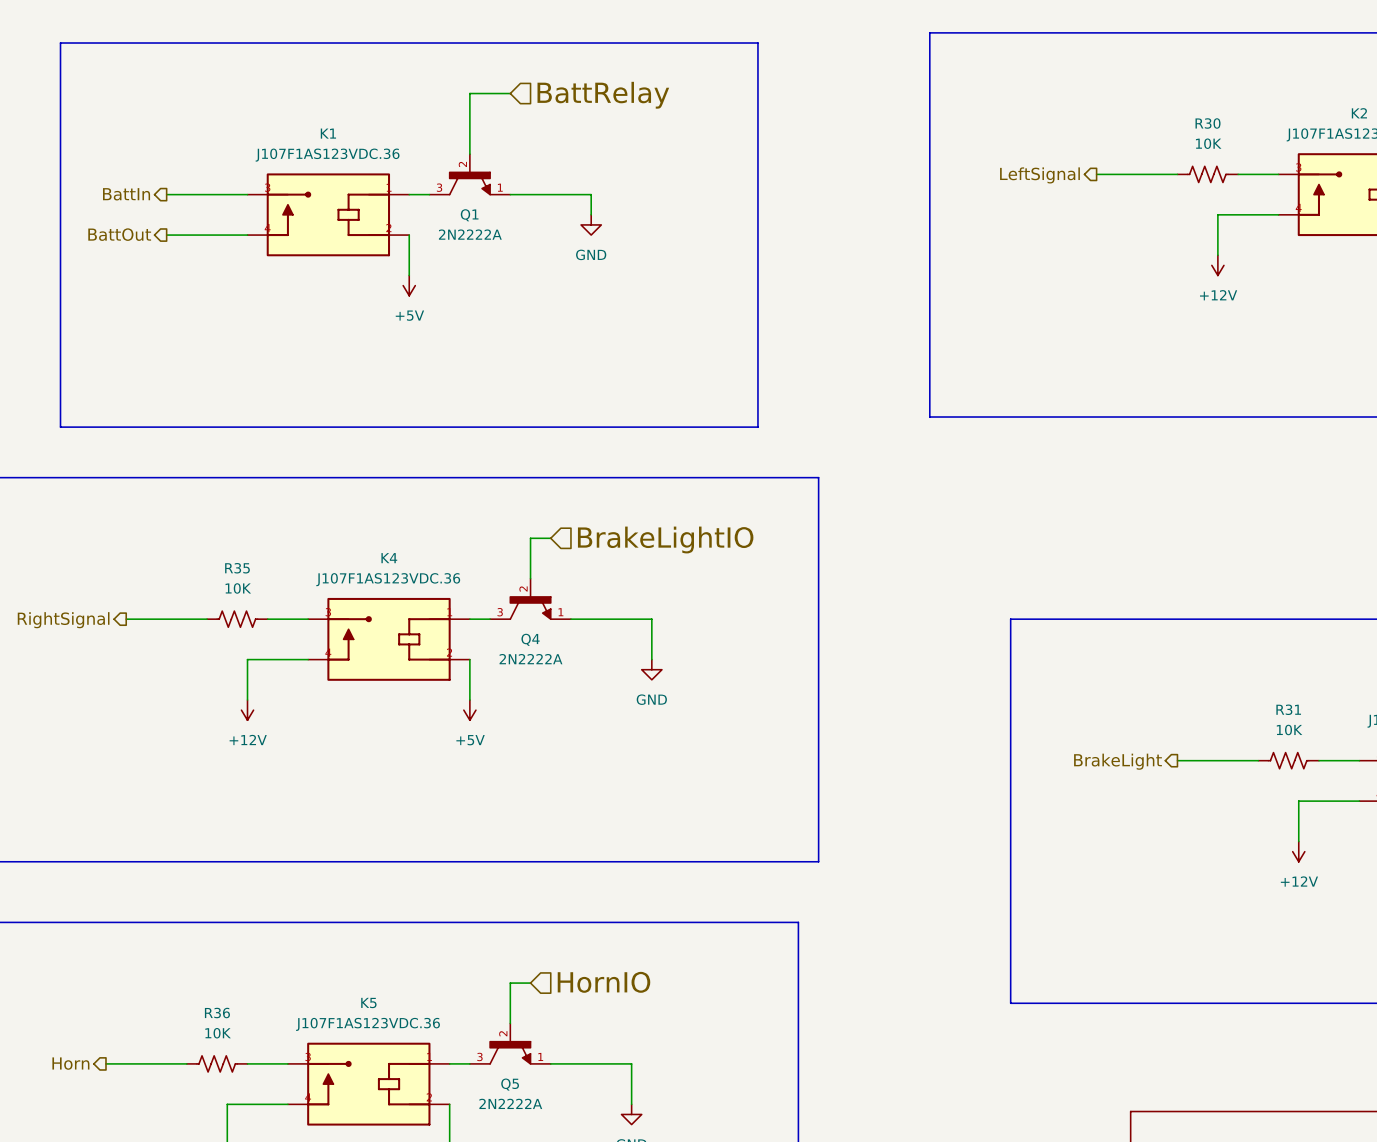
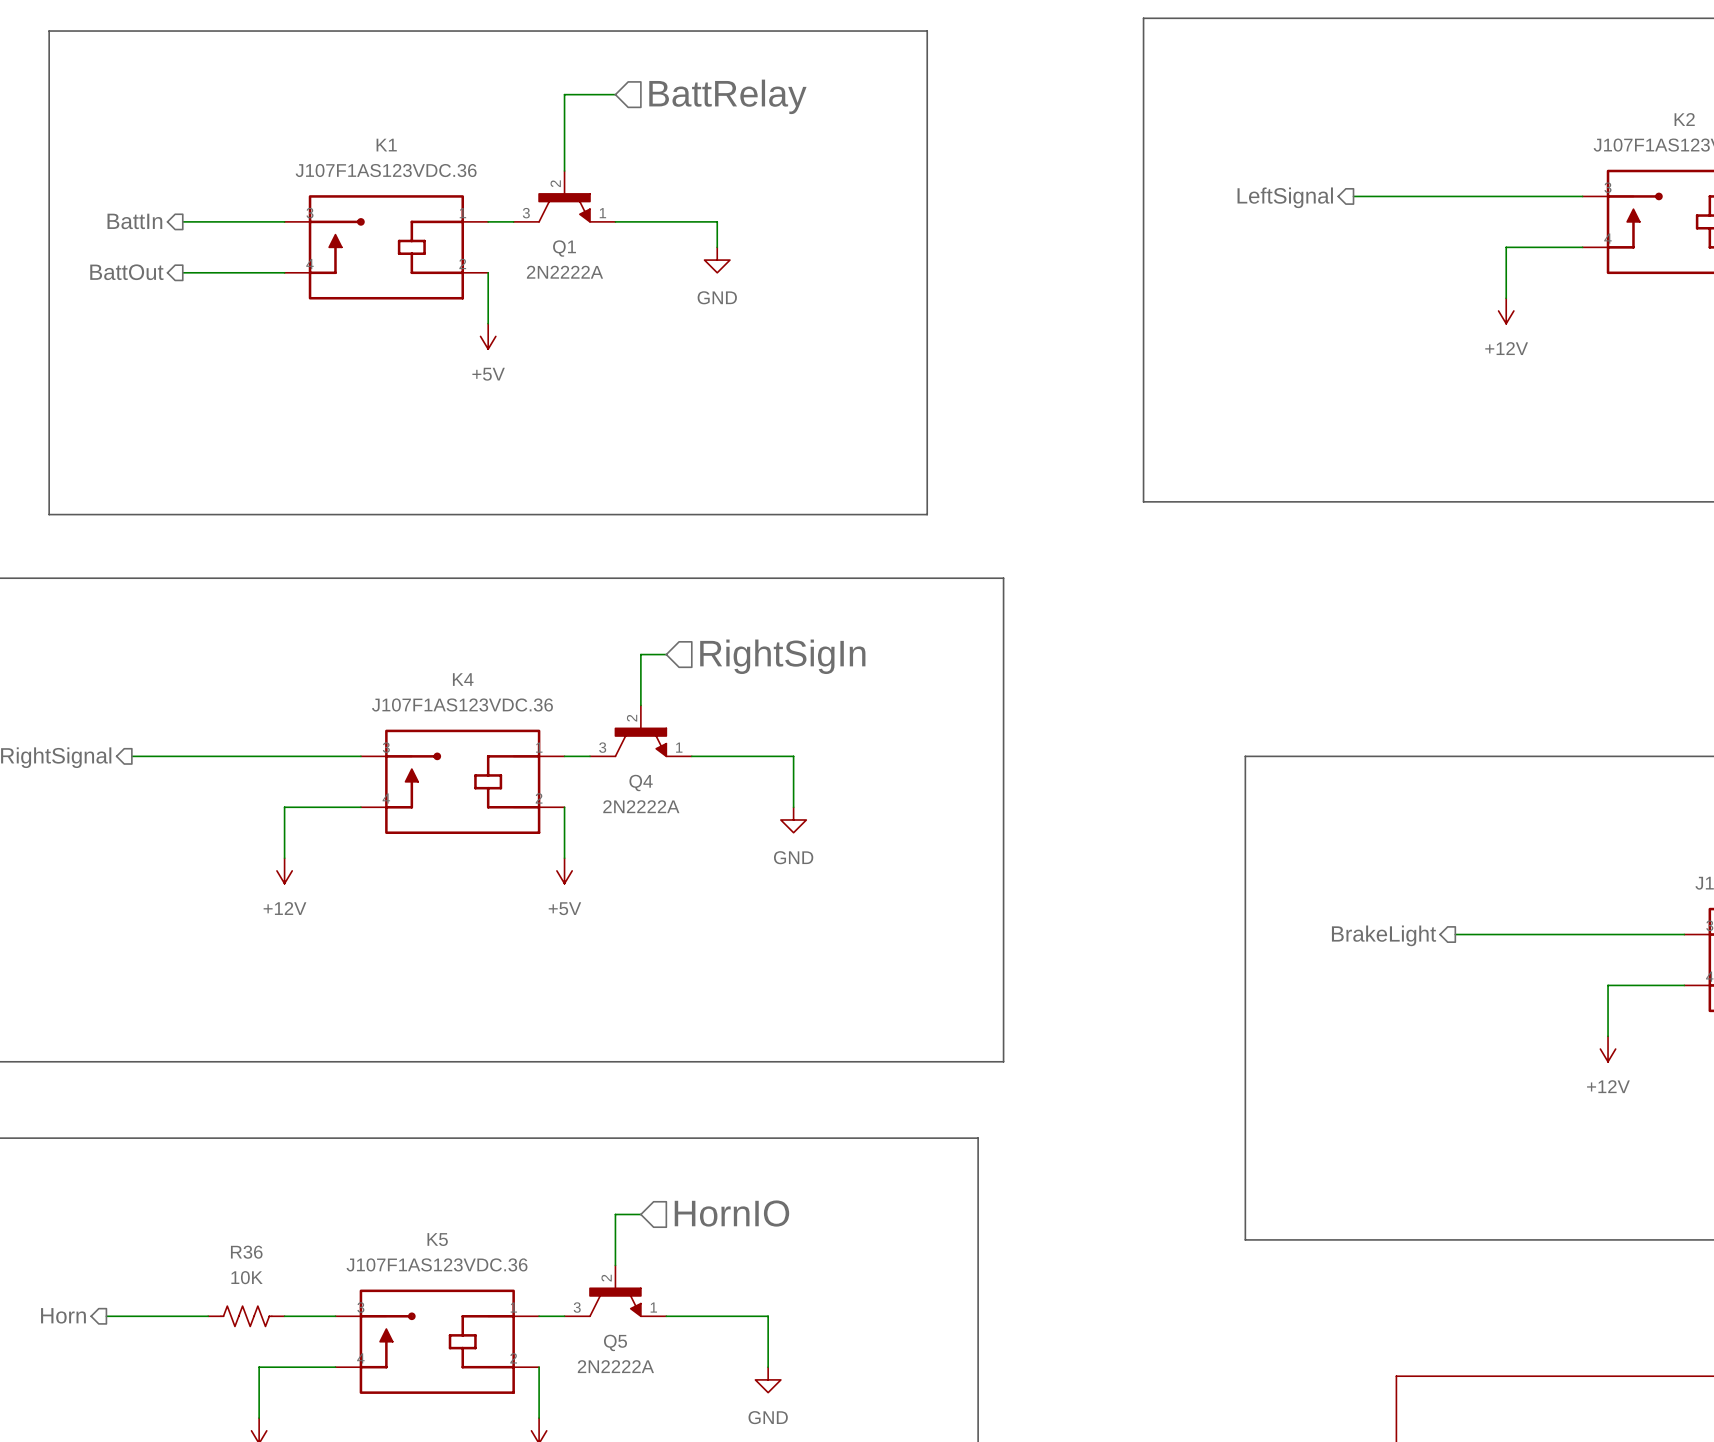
R30: 10K (1207, 174) -> none
hierarchical label: BrakeLightIO (665, 540) -> RightSigIn (782, 656)
R35: 10K (237, 619) -> none
R31: 10K (1288, 760) -> none

